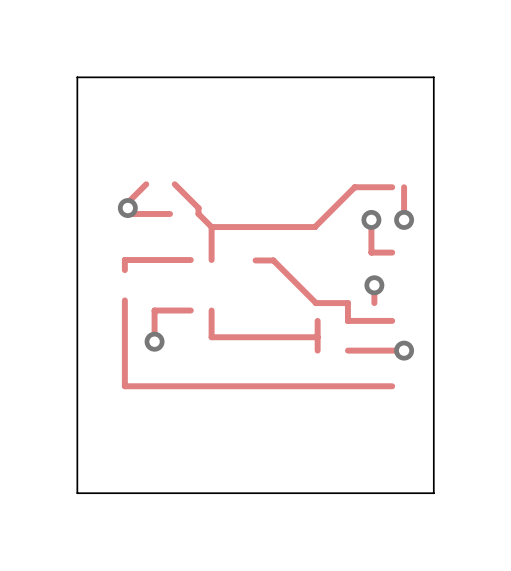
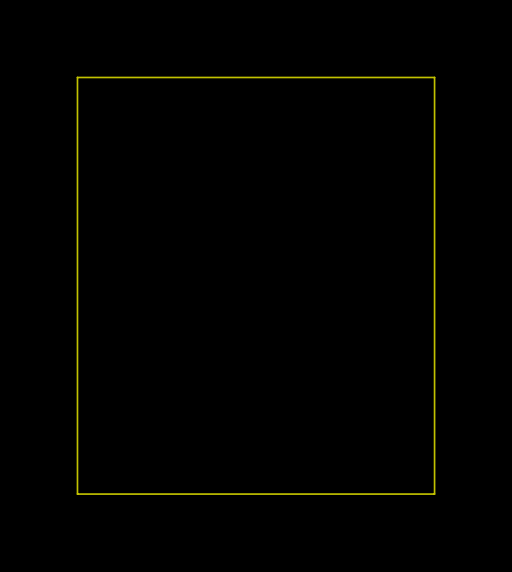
track: (146, 184) (127, 202) (127, 208) (133, 213) (170, 213) -> none
track: (174, 184) (198, 208) (198, 213) (211, 227) -> none
track: (392, 187) (354, 187) (314, 227) (211, 227) -> none
track: (404, 187) (404, 219) -> none
via: (127, 208) -> none
track: (371, 219) (371, 252) (392, 252) -> none
via: (371, 219) -> none
via: (404, 219) -> none
track: (211, 227) (211, 260) -> none
track: (190, 260) (124, 260) (124, 270) -> none
track: (255, 260) (273, 260) (316, 303) (347, 303) (347, 320) (392, 320) -> none
track: (374, 285) (374, 303) -> none
via: (374, 285) -> none
track: (124, 300) (124, 386) (392, 386) -> none
track: (190, 310) (154, 310) (154, 341) -> none
track: (211, 310) (211, 337) (317, 337) -> none
track: (317, 320) (317, 350) -> none
via: (154, 341) -> none
track: (347, 350) (404, 350) -> none
via: (404, 350) -> none

